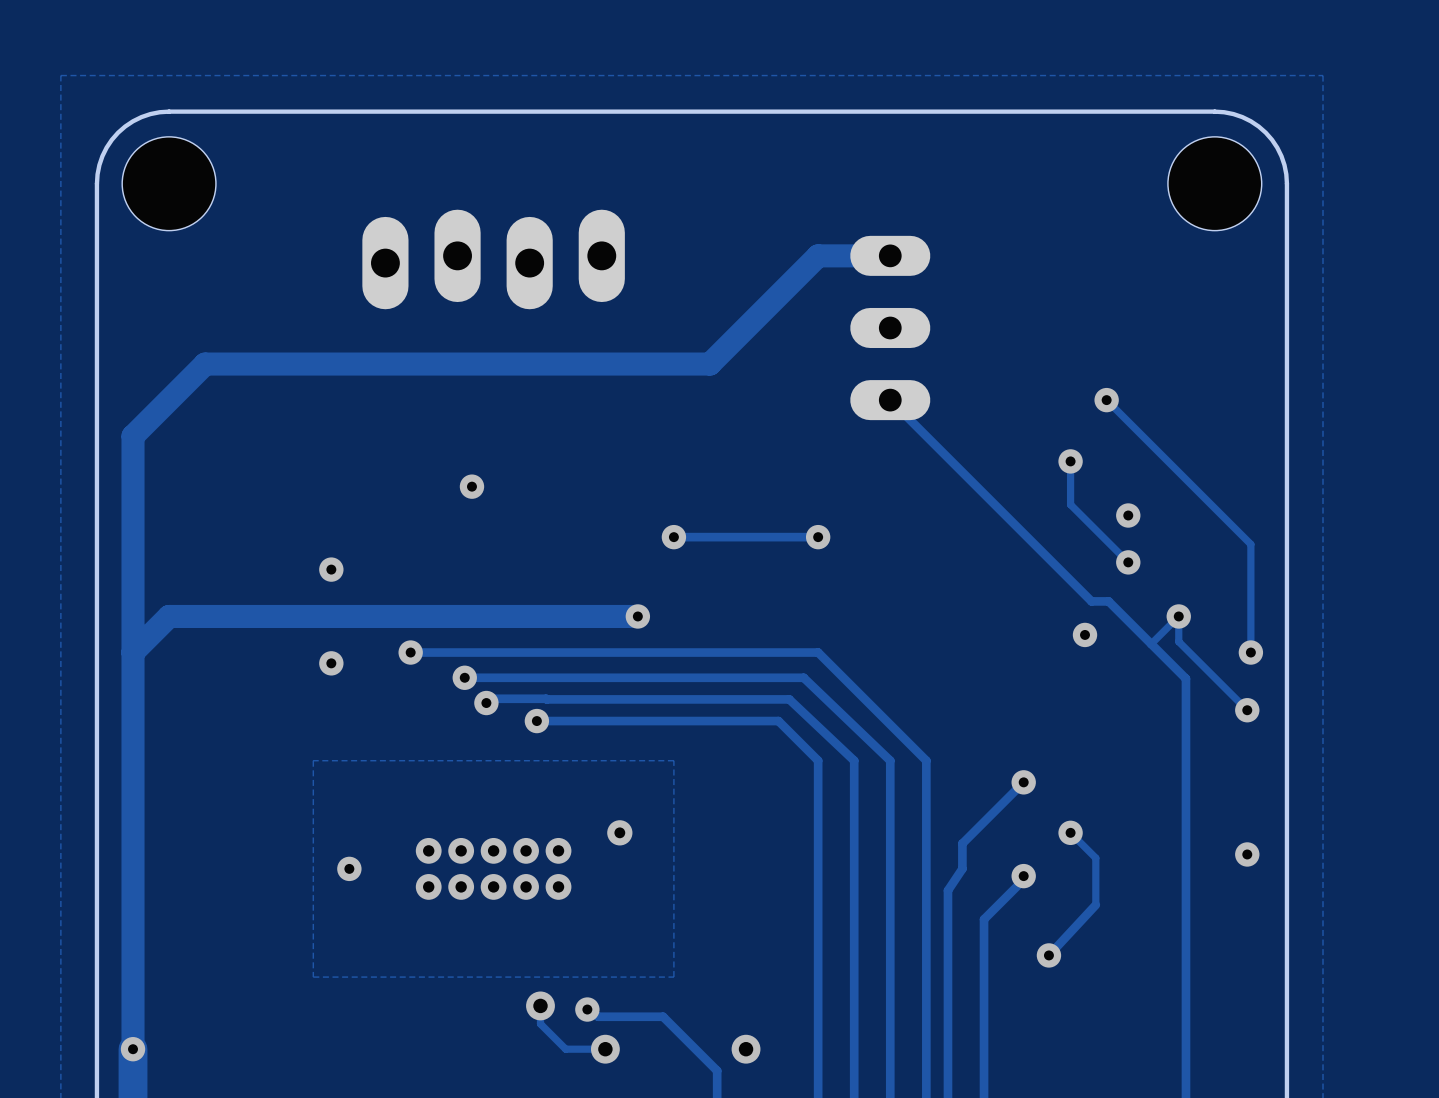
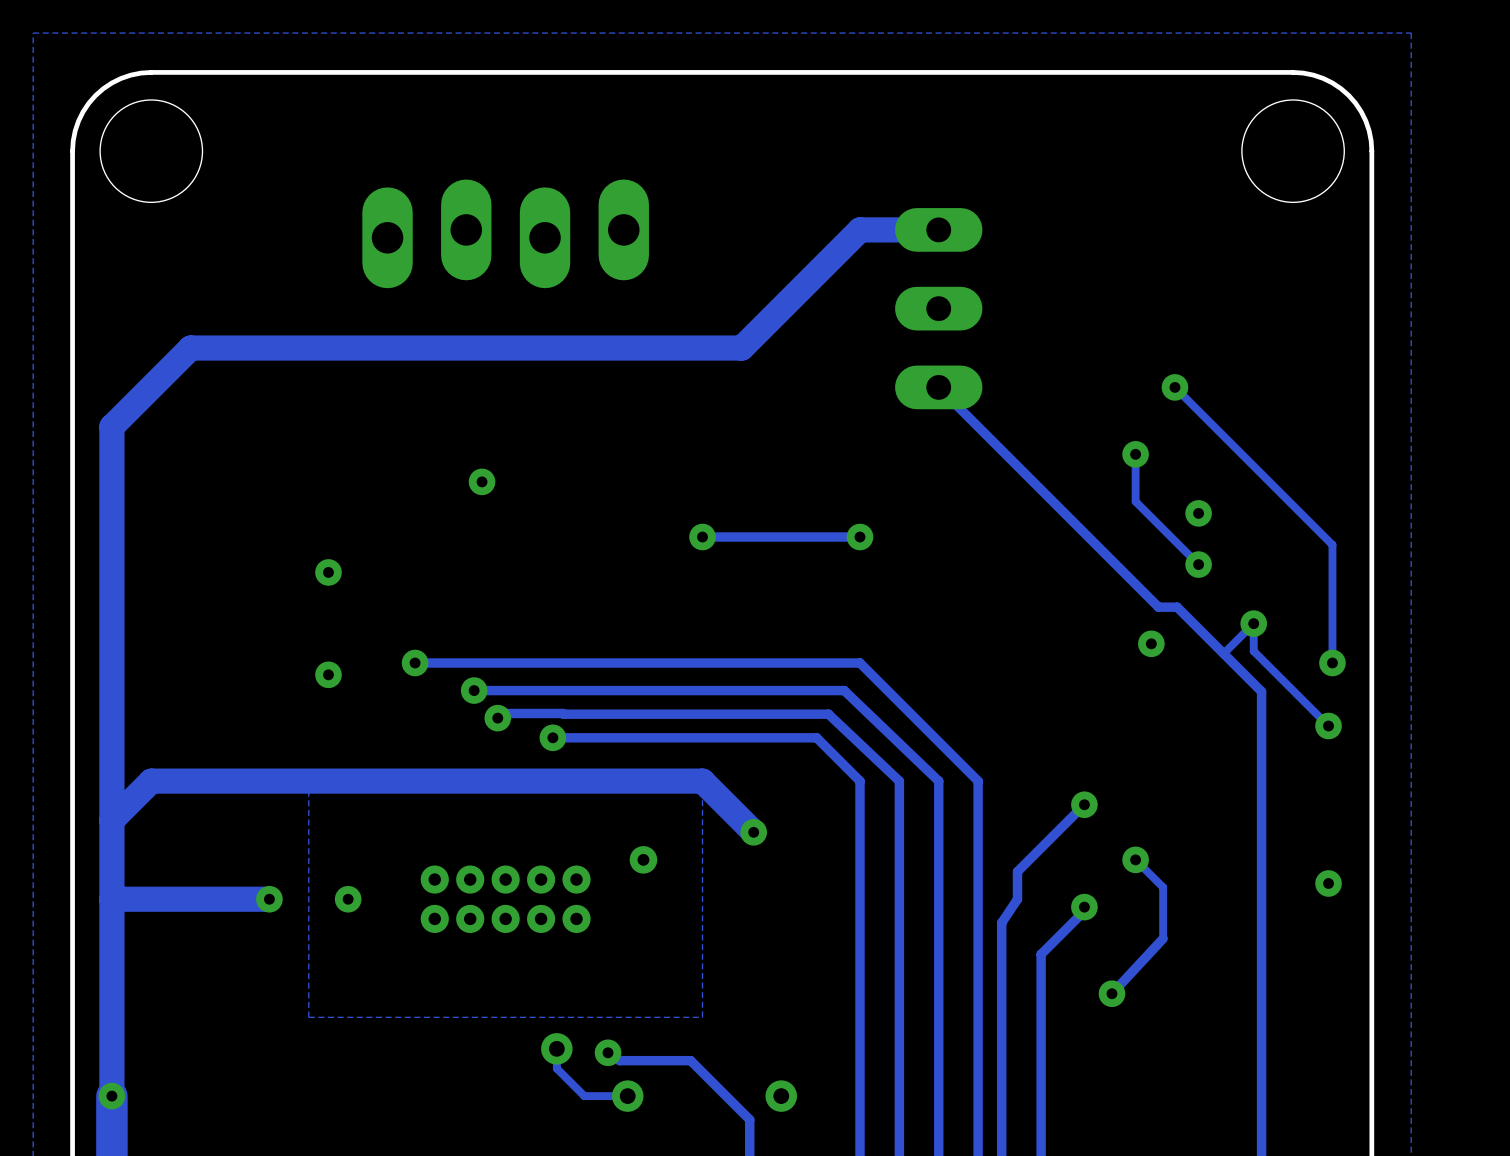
track: (637, 616) (169, 616) (133, 652) -> none
via: (637, 616) -> none
track: none -> (111, 820) (151, 781) (702, 781) (753, 832)
via: none -> (753, 832)
track: none -> (269, 899) (111, 899)
via: none -> (269, 899)

